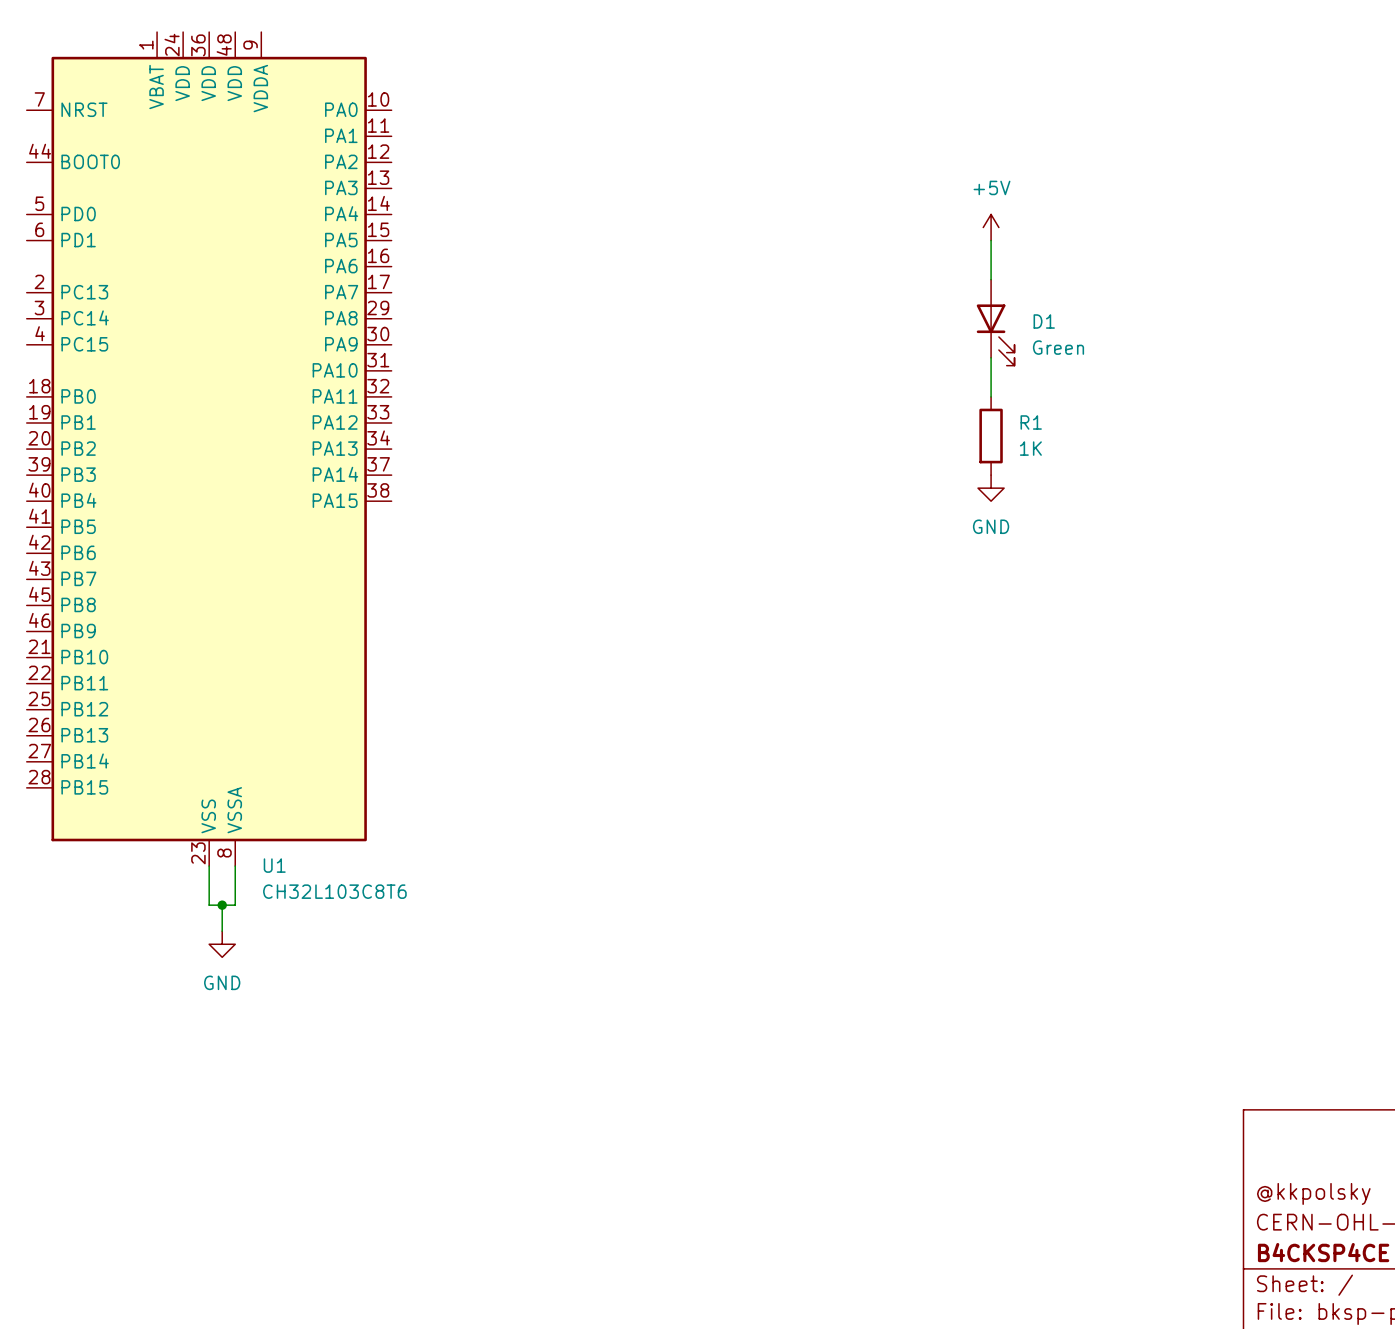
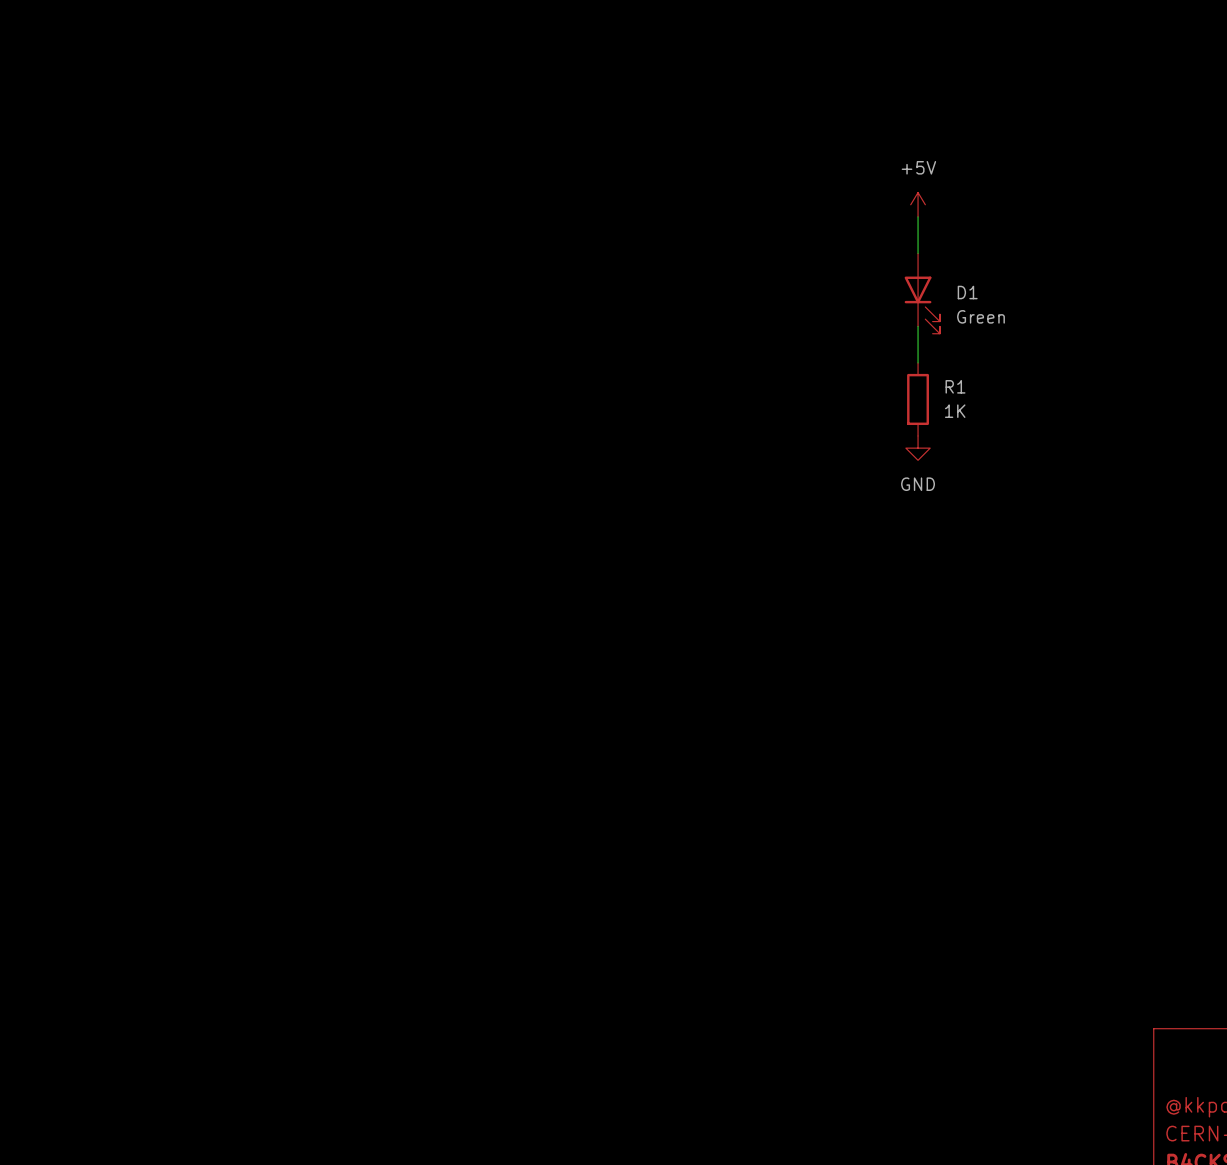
U1: CH32L103C8T6 (209, 449) -> none
wire: (209, 866) (209, 905) (235, 905) (235, 866) -> none
wire: (222, 905) (222, 931) -> none
junction: (222, 905) -> none
power symbol: GND (222, 944) -> none

